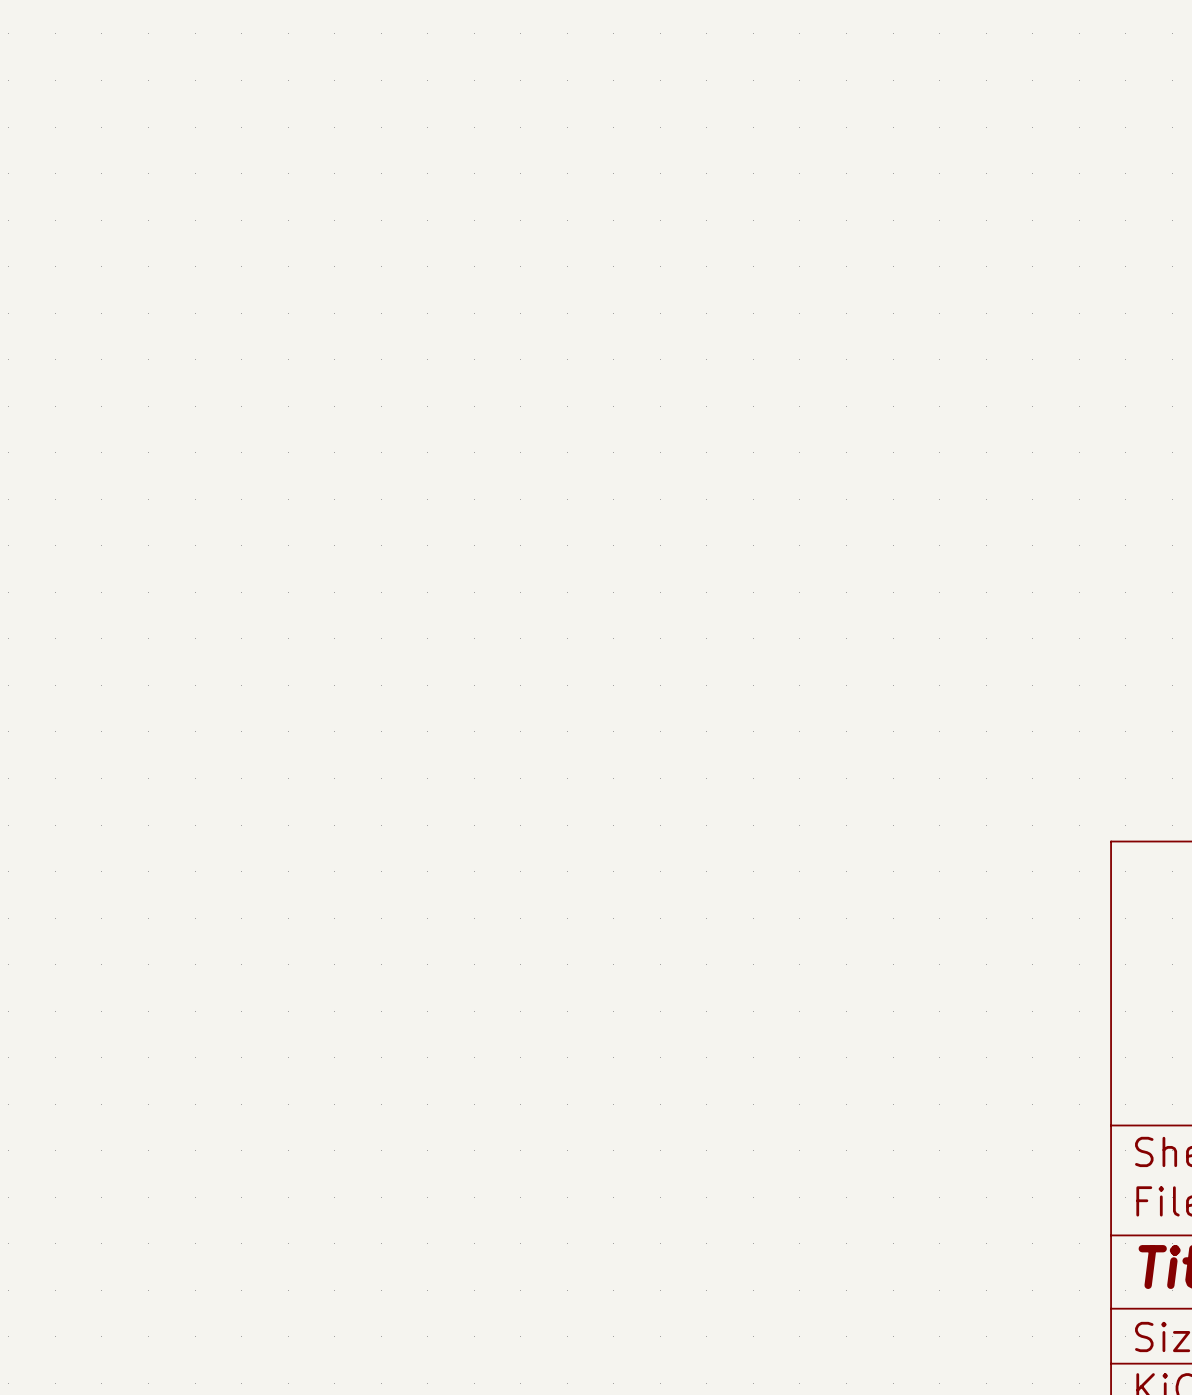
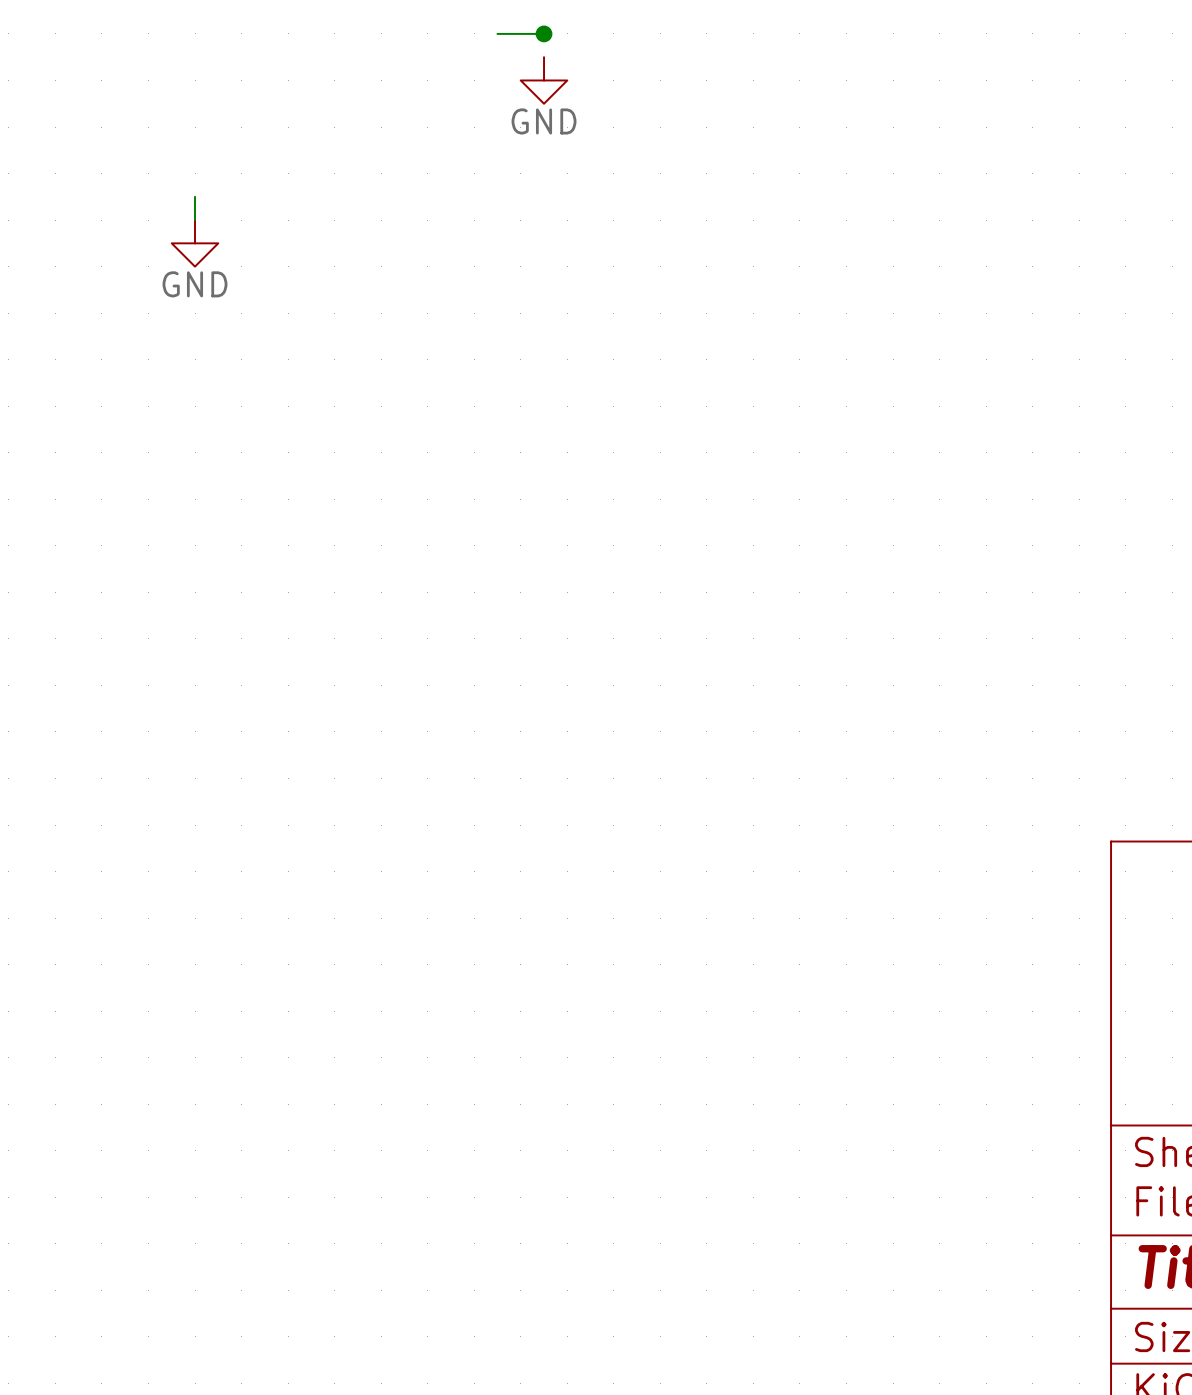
wire: none -> (497, 33) (544, 33)
junction: none -> (544, 33)
power symbol: none -> GND (544, 80)
wire: none -> (195, 196) (195, 220)
power symbol: none -> GND (195, 243)

